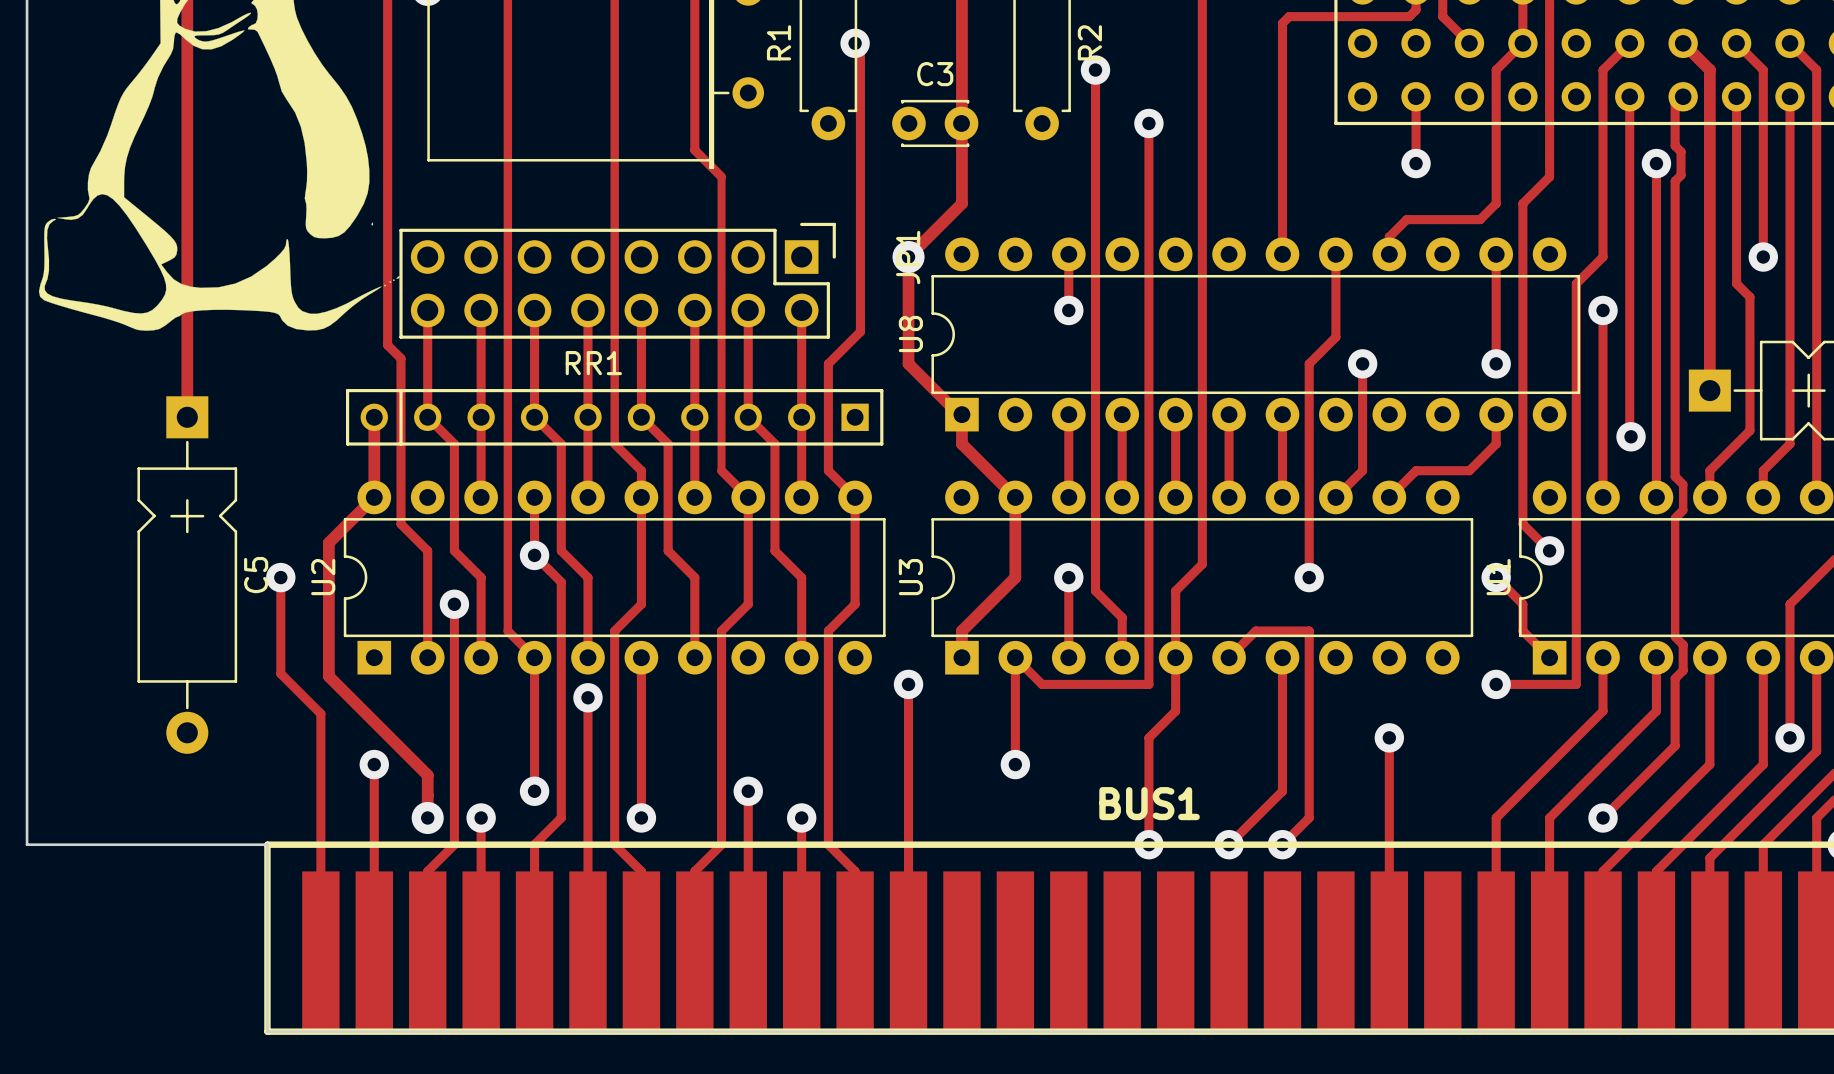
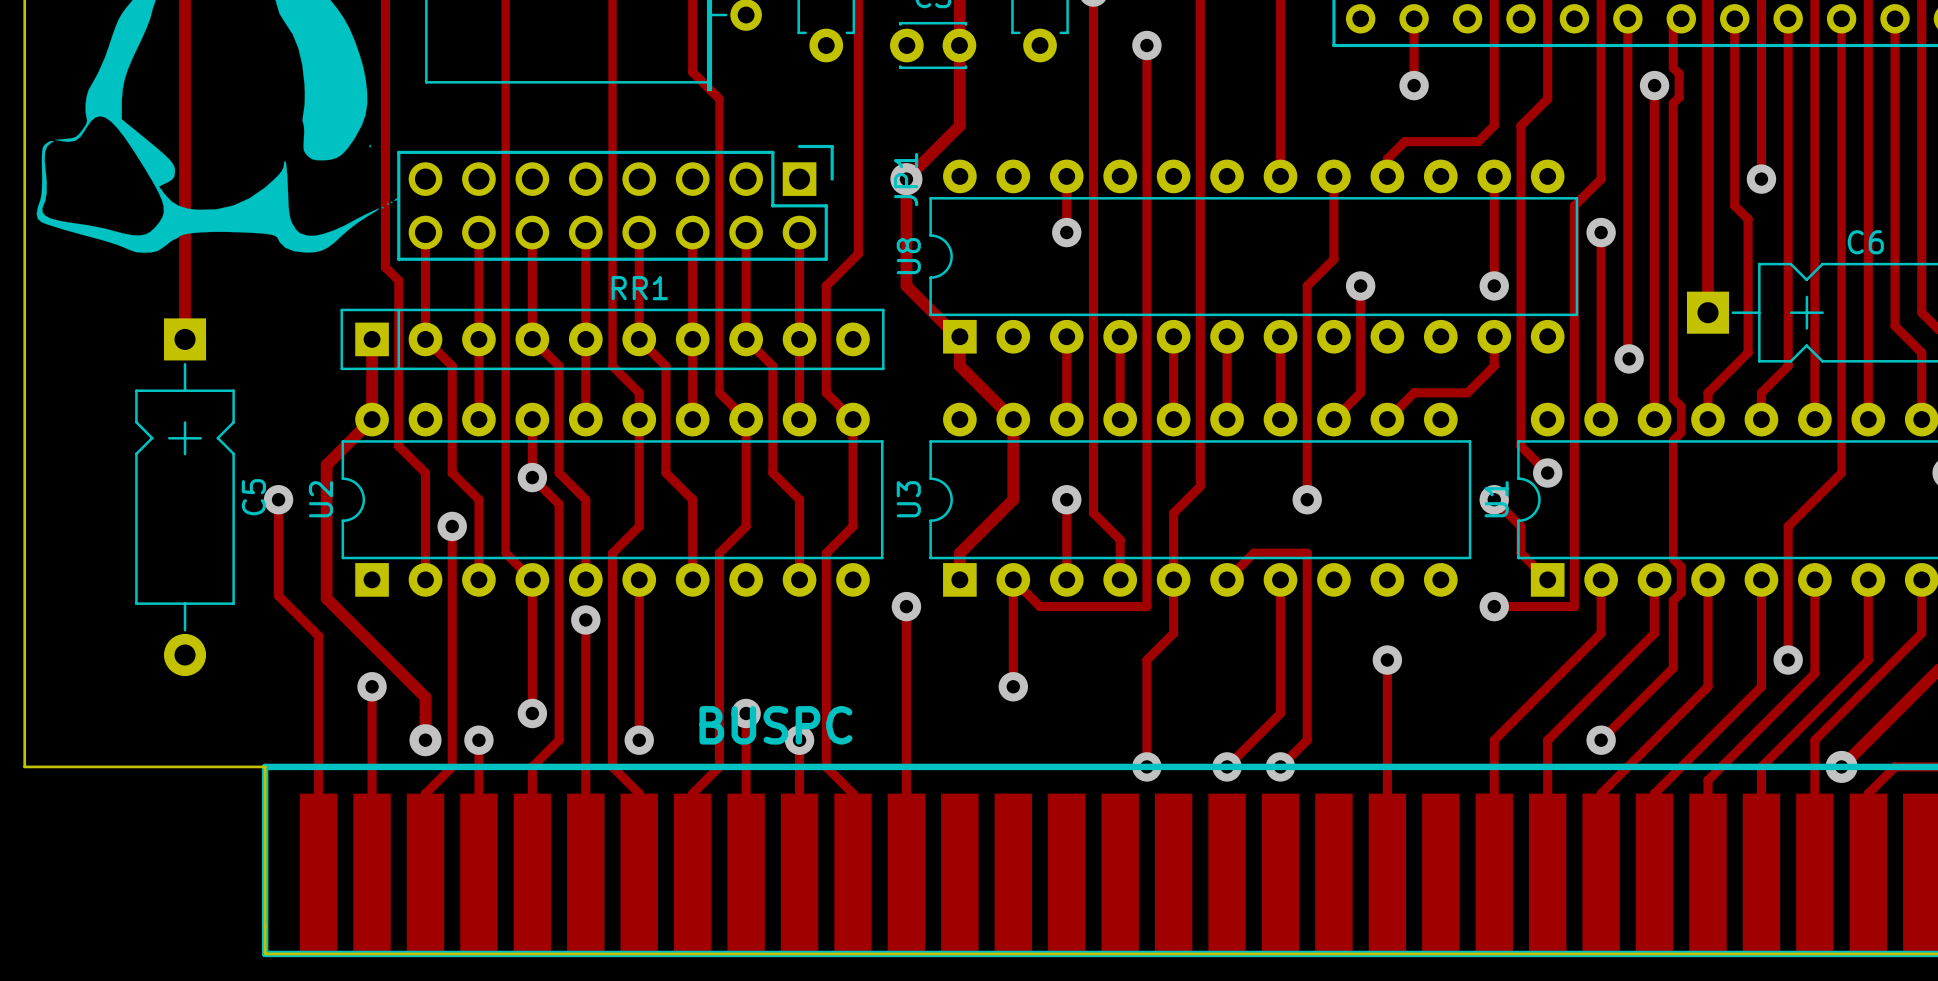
RR1 name position: RR1 (593, 363) -> RR1 (639, 288)
RR1 footprint: [346, 389, 884, 446] -> [340, 308, 885, 371]
BUS1 value: none -> BUSPC (775, 725)
BUS1 name: BUS1 (1149, 803) -> none

